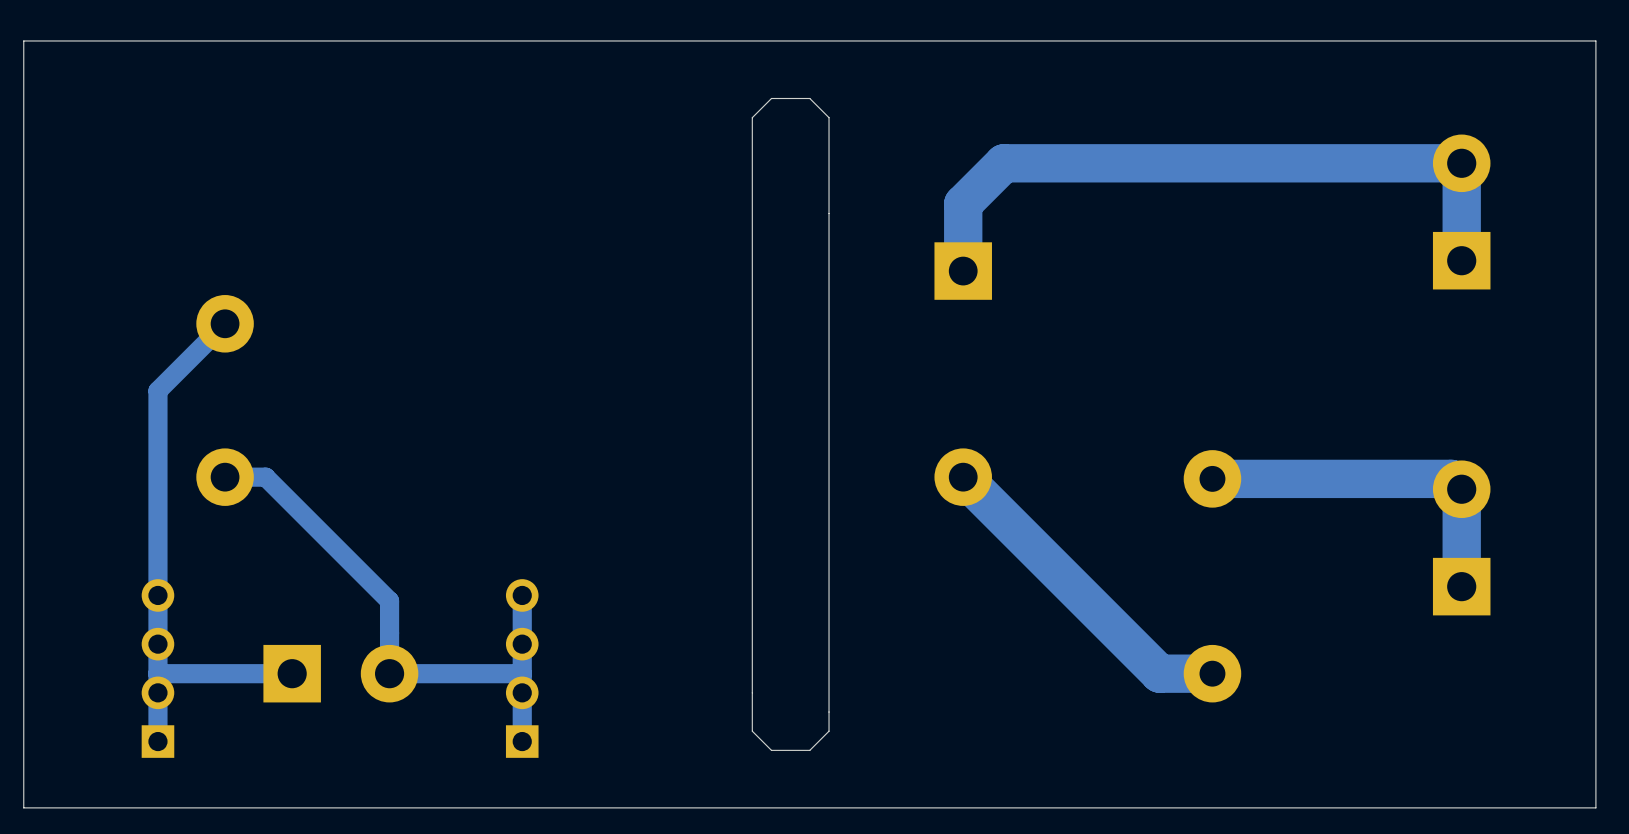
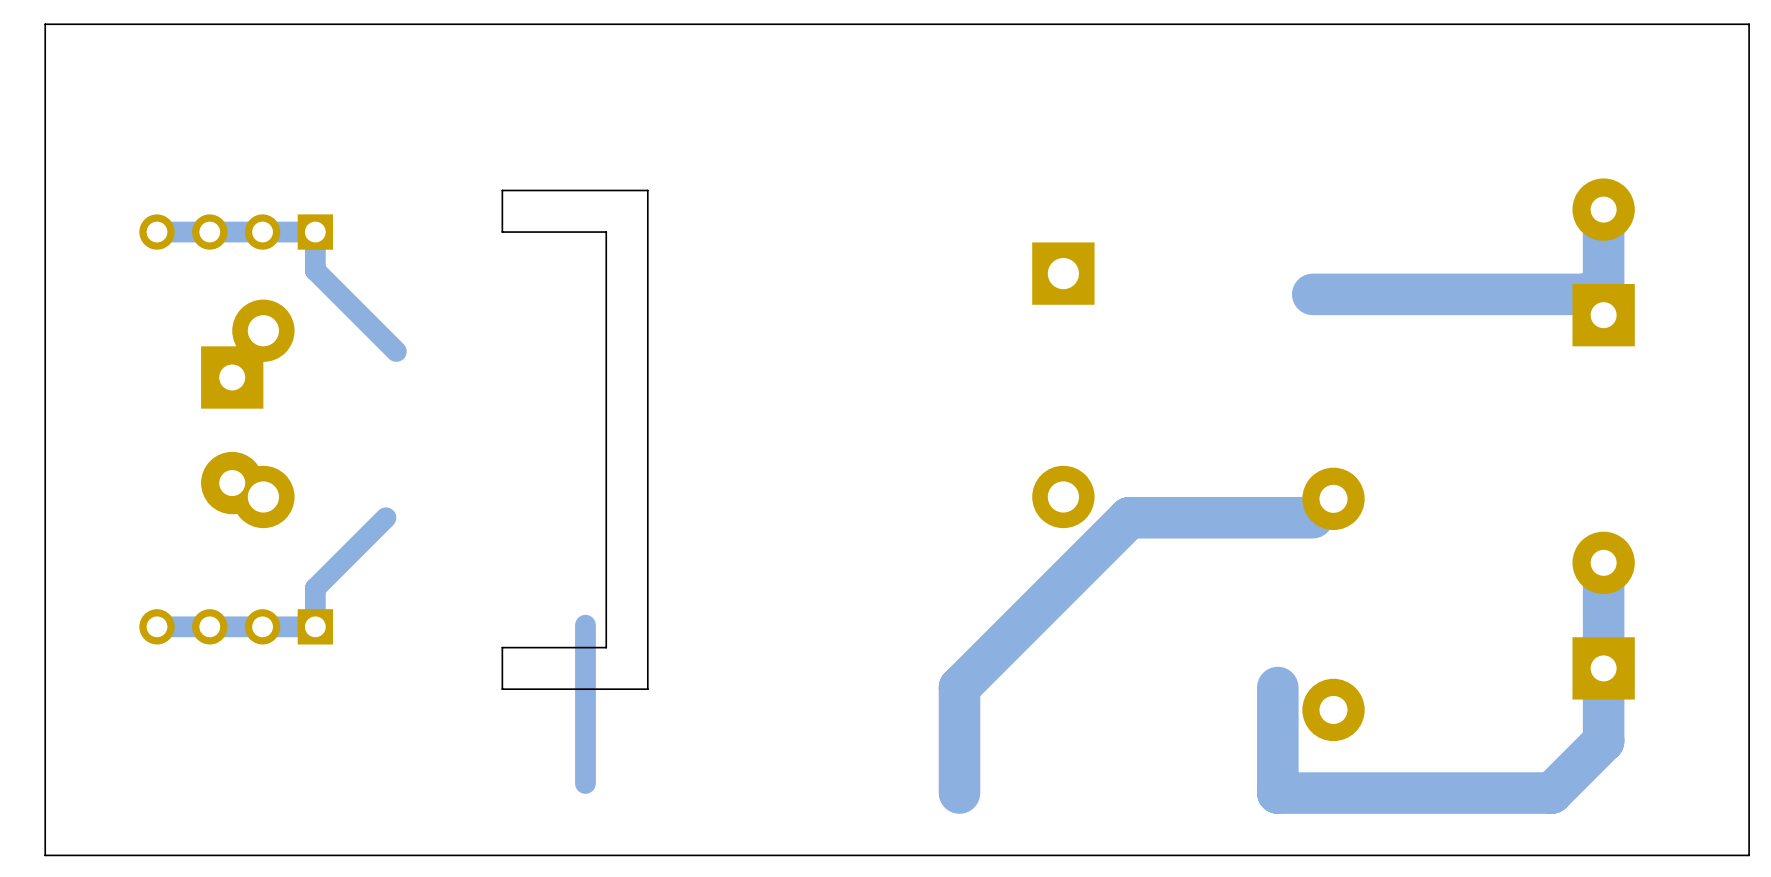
board edge: (809, 98) (771, 98) (752, 117) (752, 731) (771, 750) (809, 750) (829, 731) (829, 117) (809, 98) -> none
board edge: none -> (647, 190) (502, 190) (502, 232) (606, 232) (606, 647) (502, 647) (502, 689) (647, 689) (647, 190)
track: (1461, 212) (1461, 163) (1003, 163) (963, 203) (963, 271) -> none
part: (1461, 212) -> none
track: none -> (157, 232) (315, 232) (315, 270) (396, 351)
part: none -> (236, 232)
track: none -> (1603, 262) (1603, 315) (1582, 294) (1312, 294)
part: none -> (1603, 262)
track: (225, 323) (157, 390) (157, 741) -> none
part: none -> (232, 430)
track: (225, 477) (265, 477) (389, 600) (389, 673) (522, 673) -> none
track: (963, 477) (1159, 673) (1212, 673) -> none
track: (1212, 478) (1451, 478) (1461, 489) (1461, 537) -> none
track: none -> (385, 517) (315, 588) (315, 626) (157, 626)
track: none -> (1312, 517) (1129, 517) (959, 687) (959, 793)
part: (1461, 537) -> none
track: none -> (1603, 615) (1603, 741) (1551, 793) (1277, 793) (1277, 687)
part: none -> (1603, 615)
part rotation: 0° (157, 668) -> 90° counterclockwise (236, 626)
part: (522, 668) -> none
track: (292, 673) (157, 673) -> none
part: (340, 673) -> none

